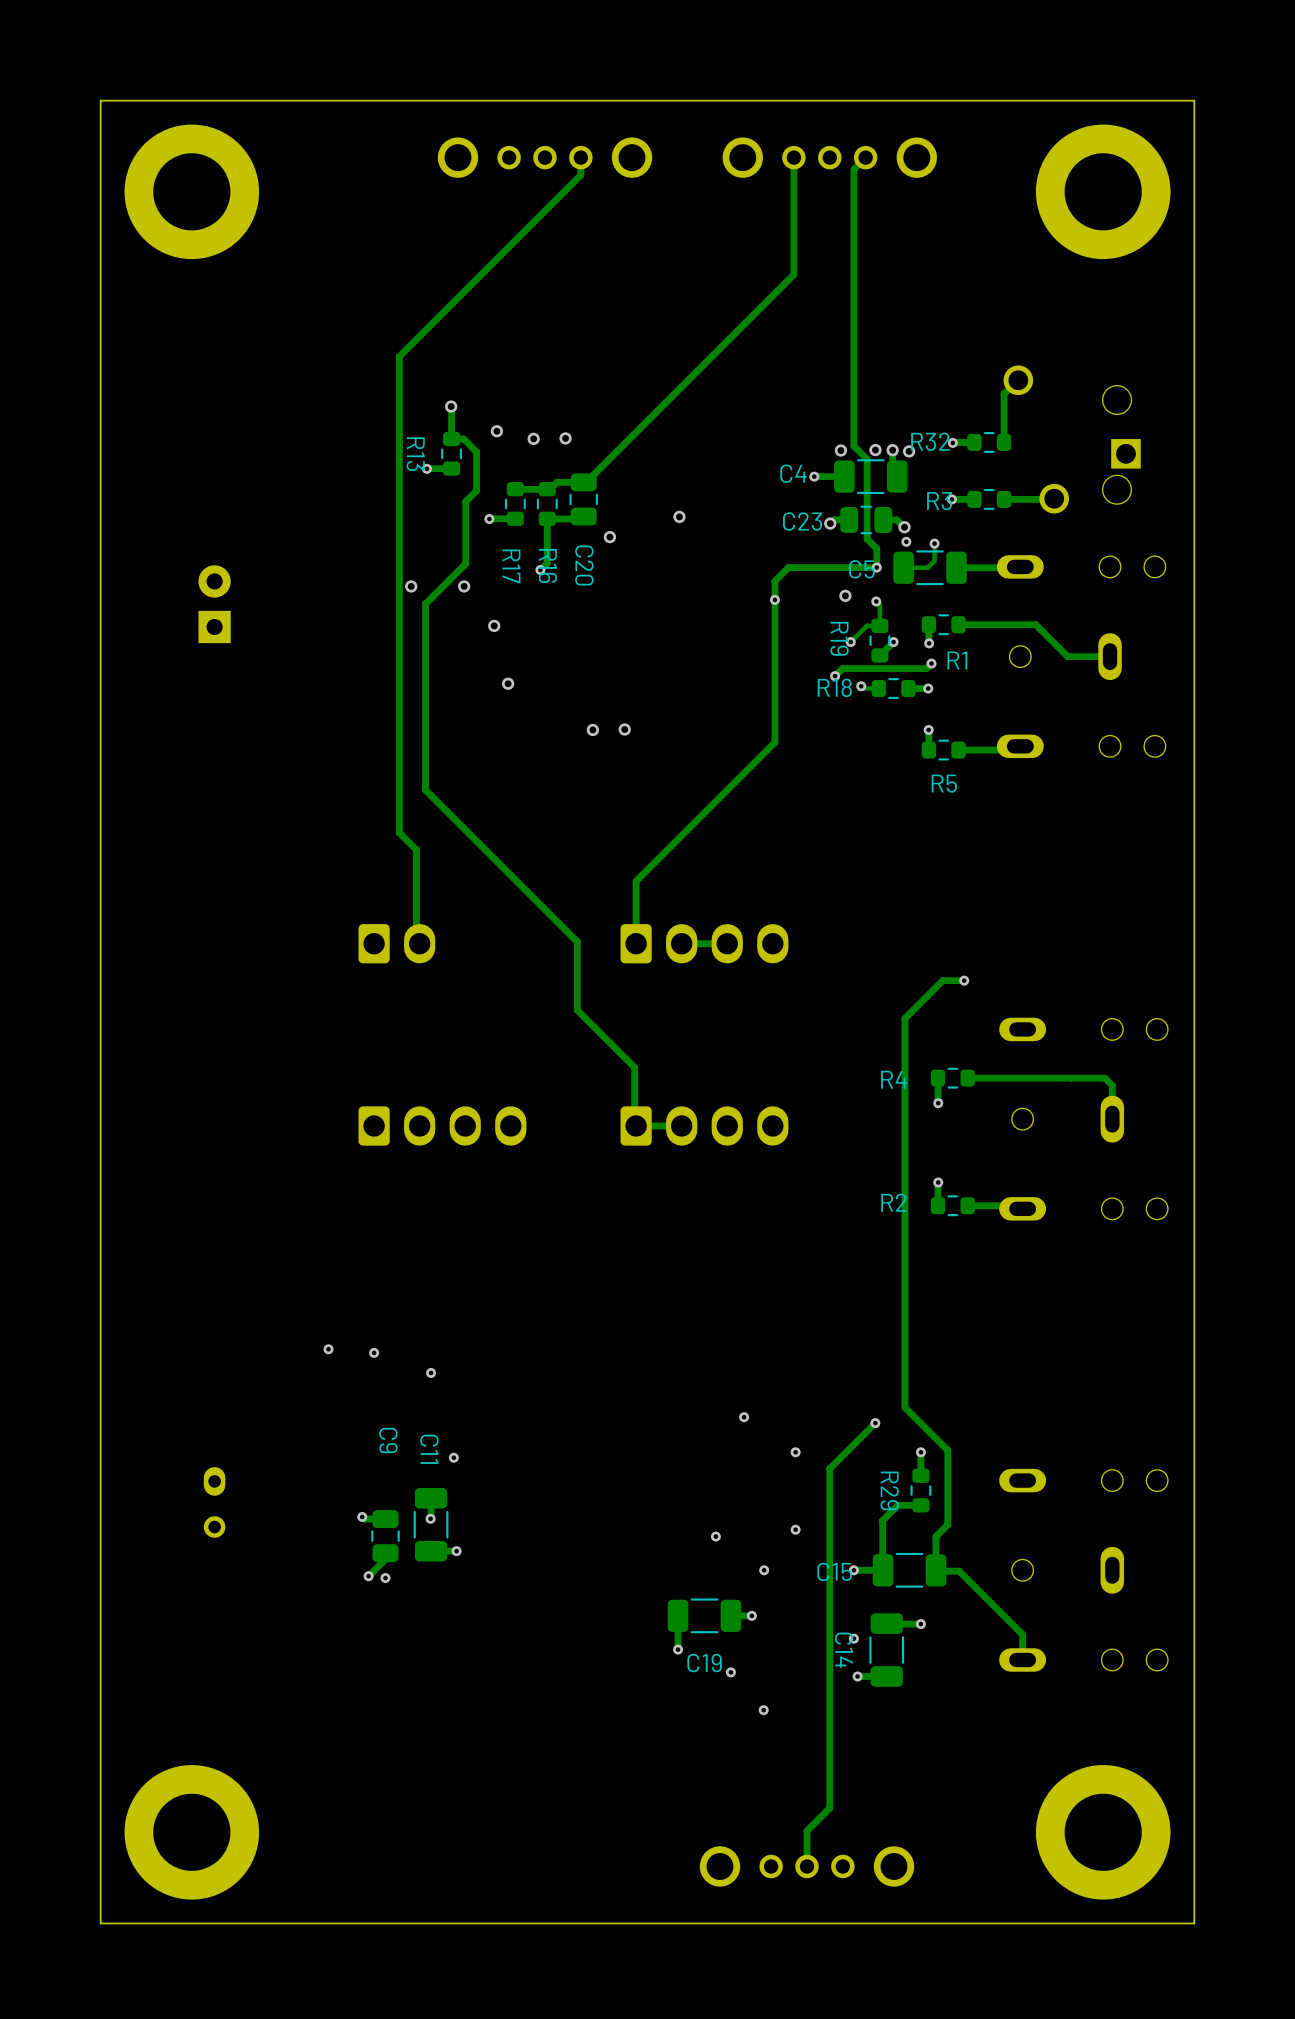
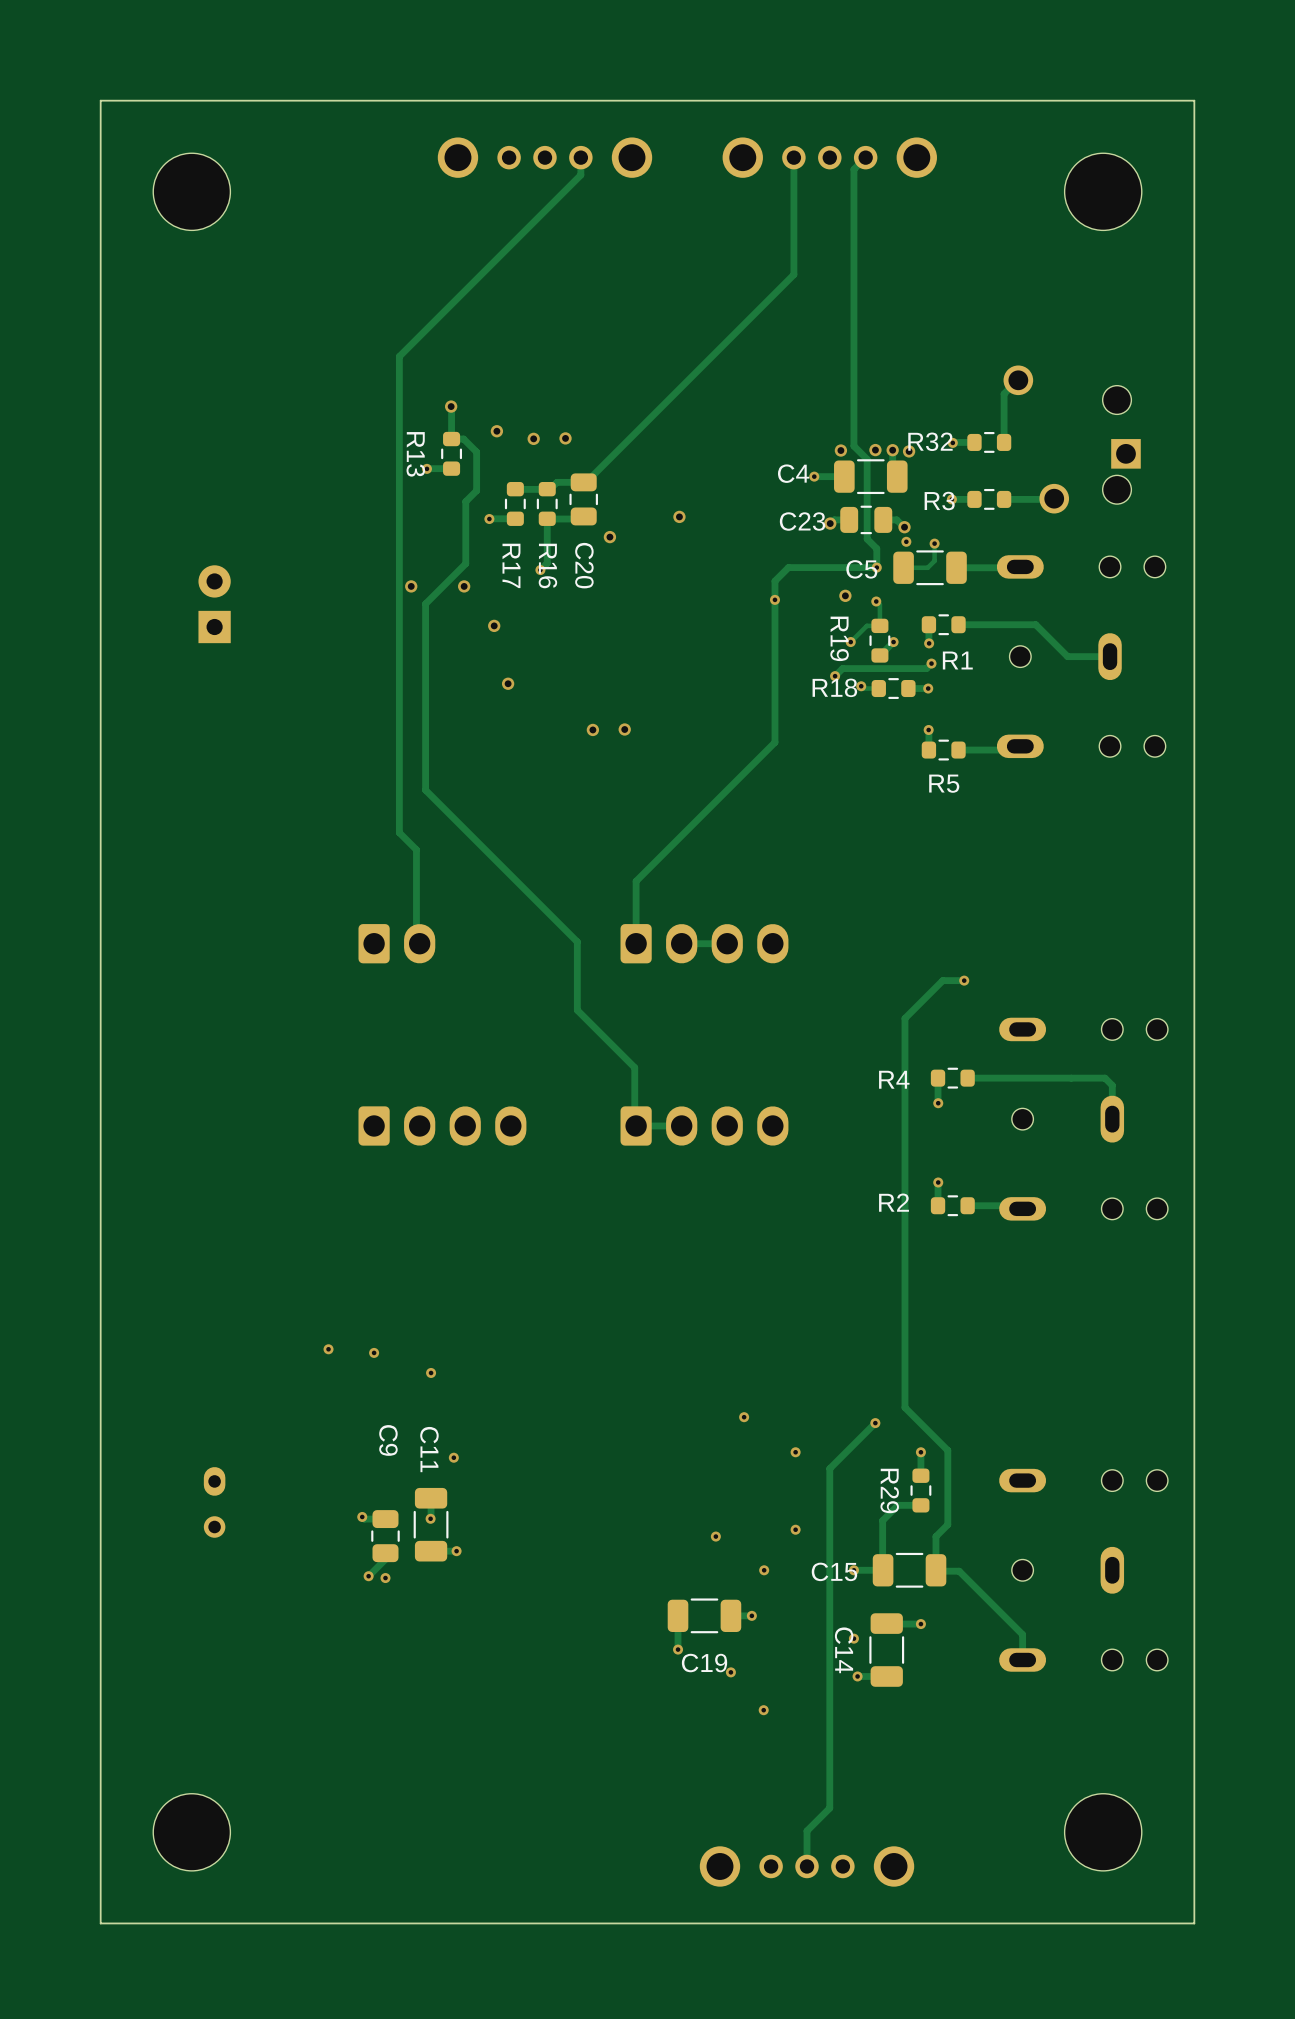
part footprint: [124, 124, 260, 260] -> [153, 153, 231, 231]
part footprint: [1035, 124, 1171, 260] -> [1064, 153, 1142, 231]
part footprint: [124, 1765, 260, 1900] -> [153, 1793, 231, 1871]
part footprint: [1035, 1765, 1171, 1900] -> [1064, 1793, 1142, 1871]

